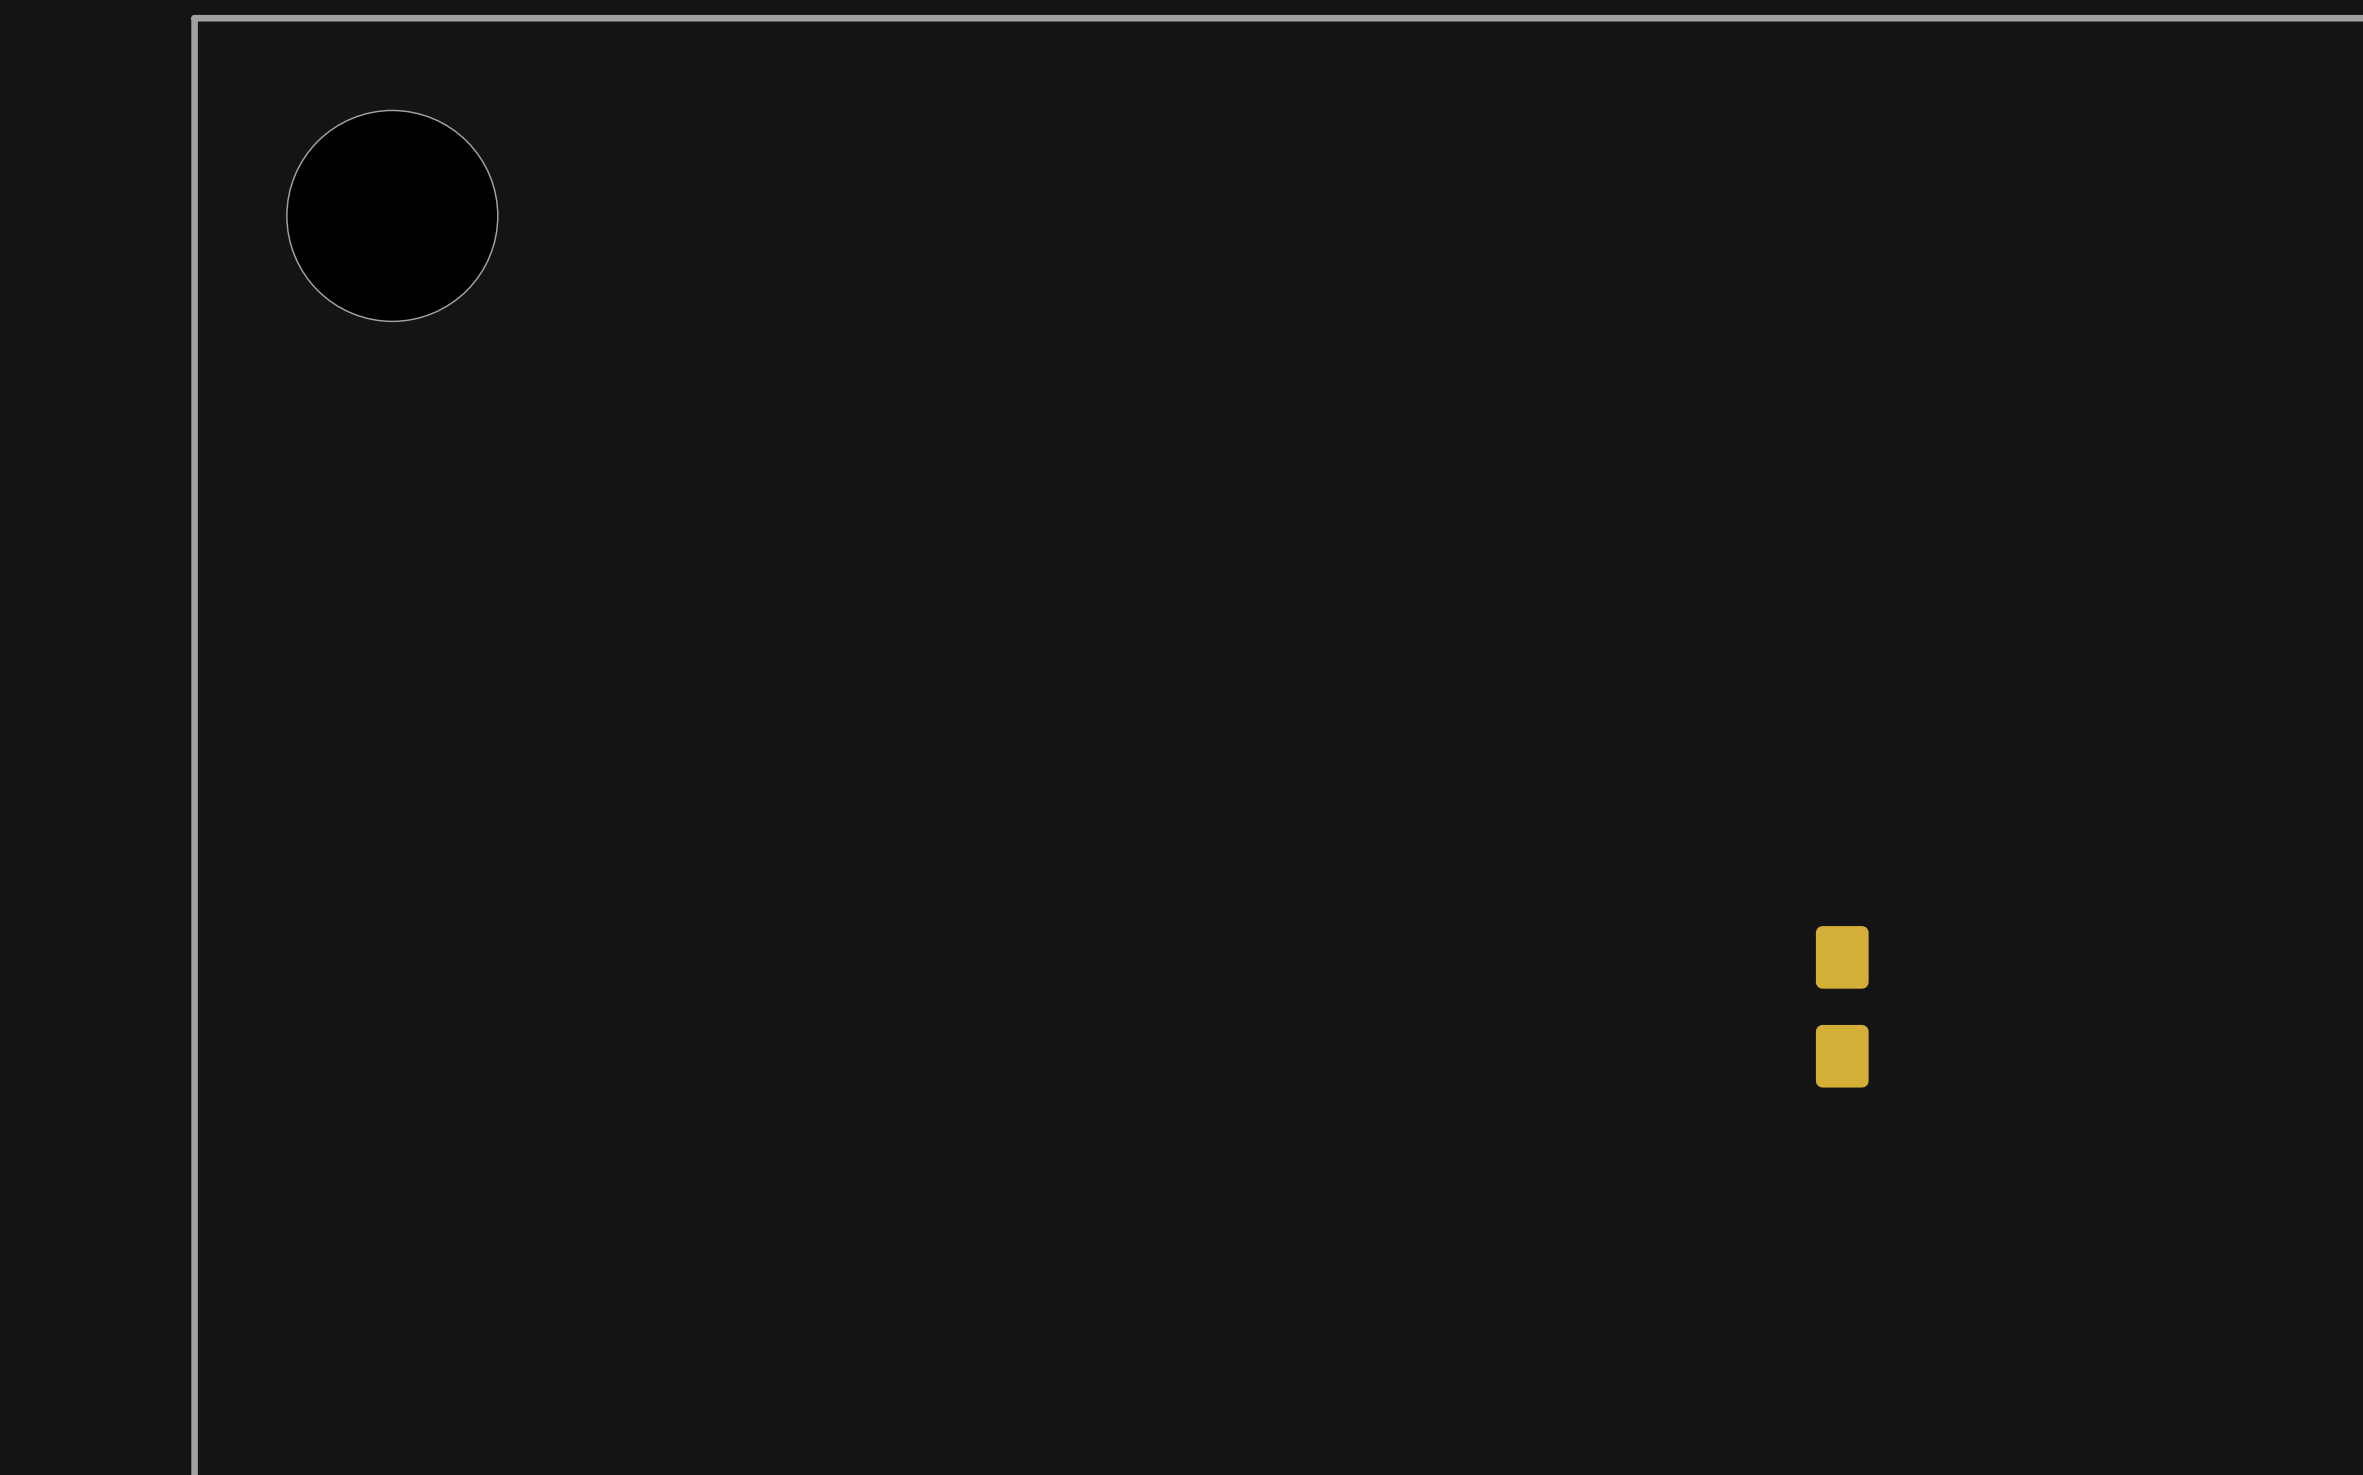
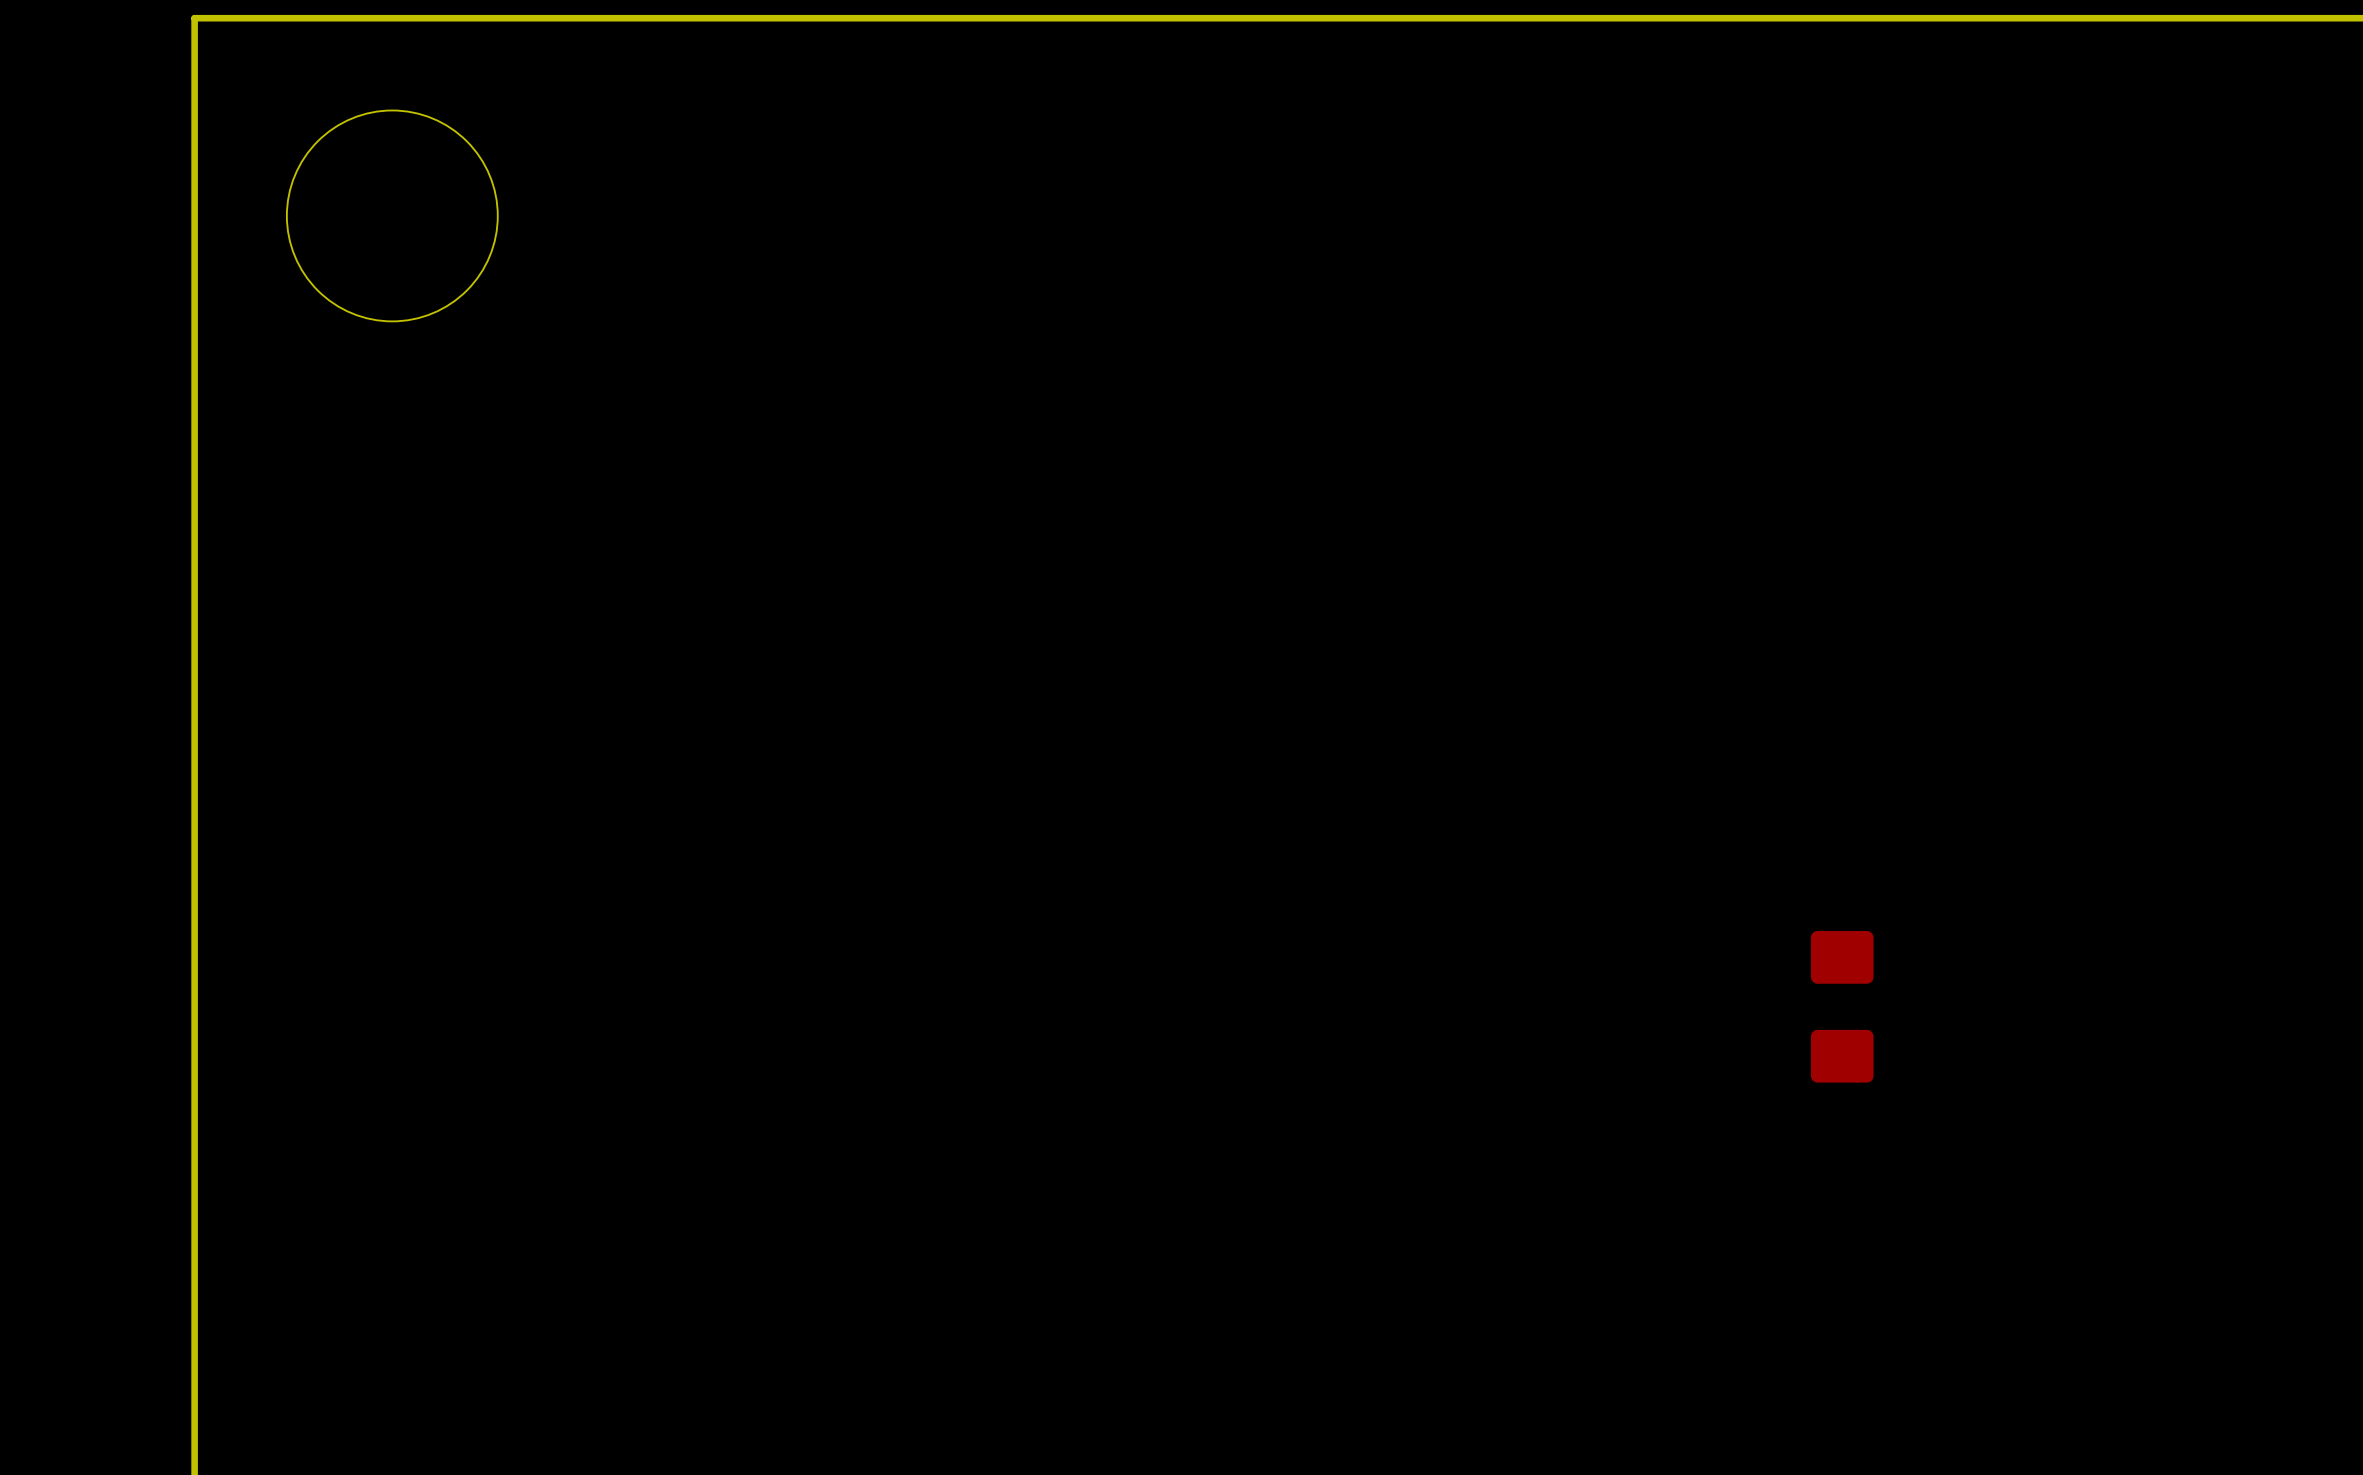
part footprint: [1815, 926, 1869, 1088] -> [1810, 931, 1874, 1083]

